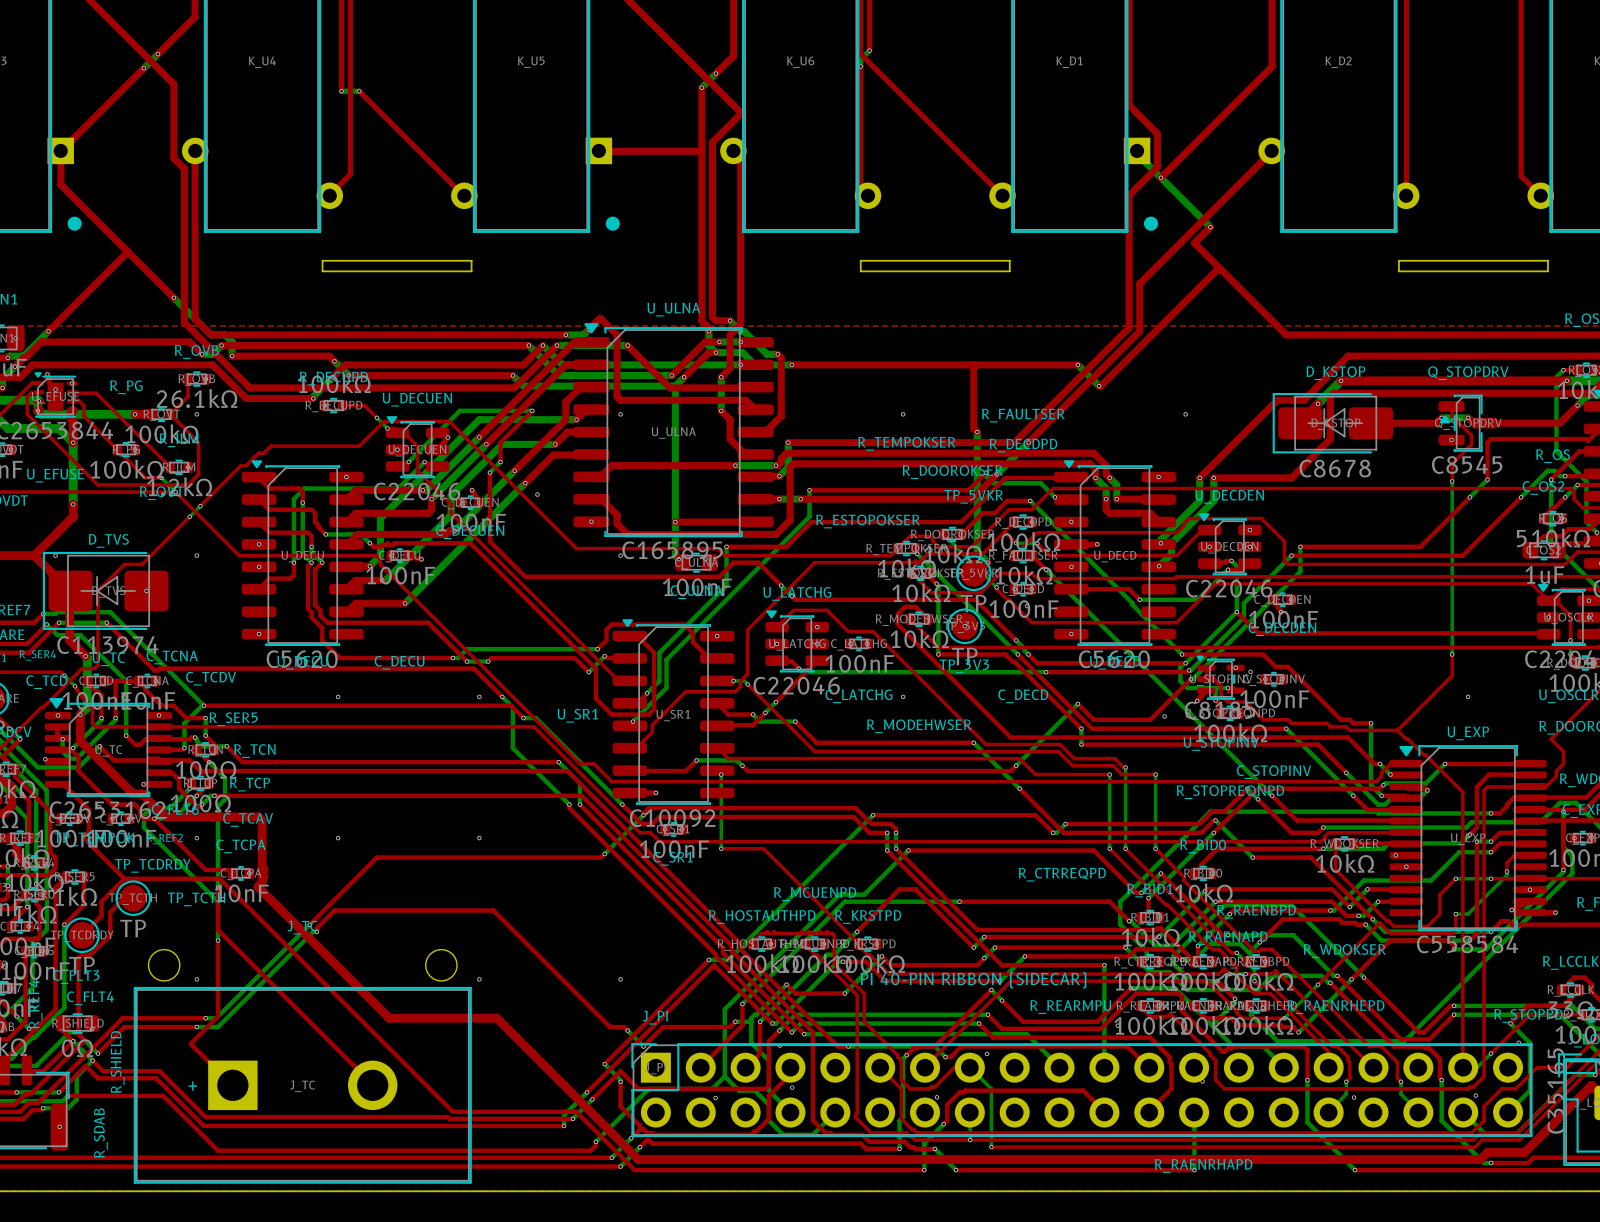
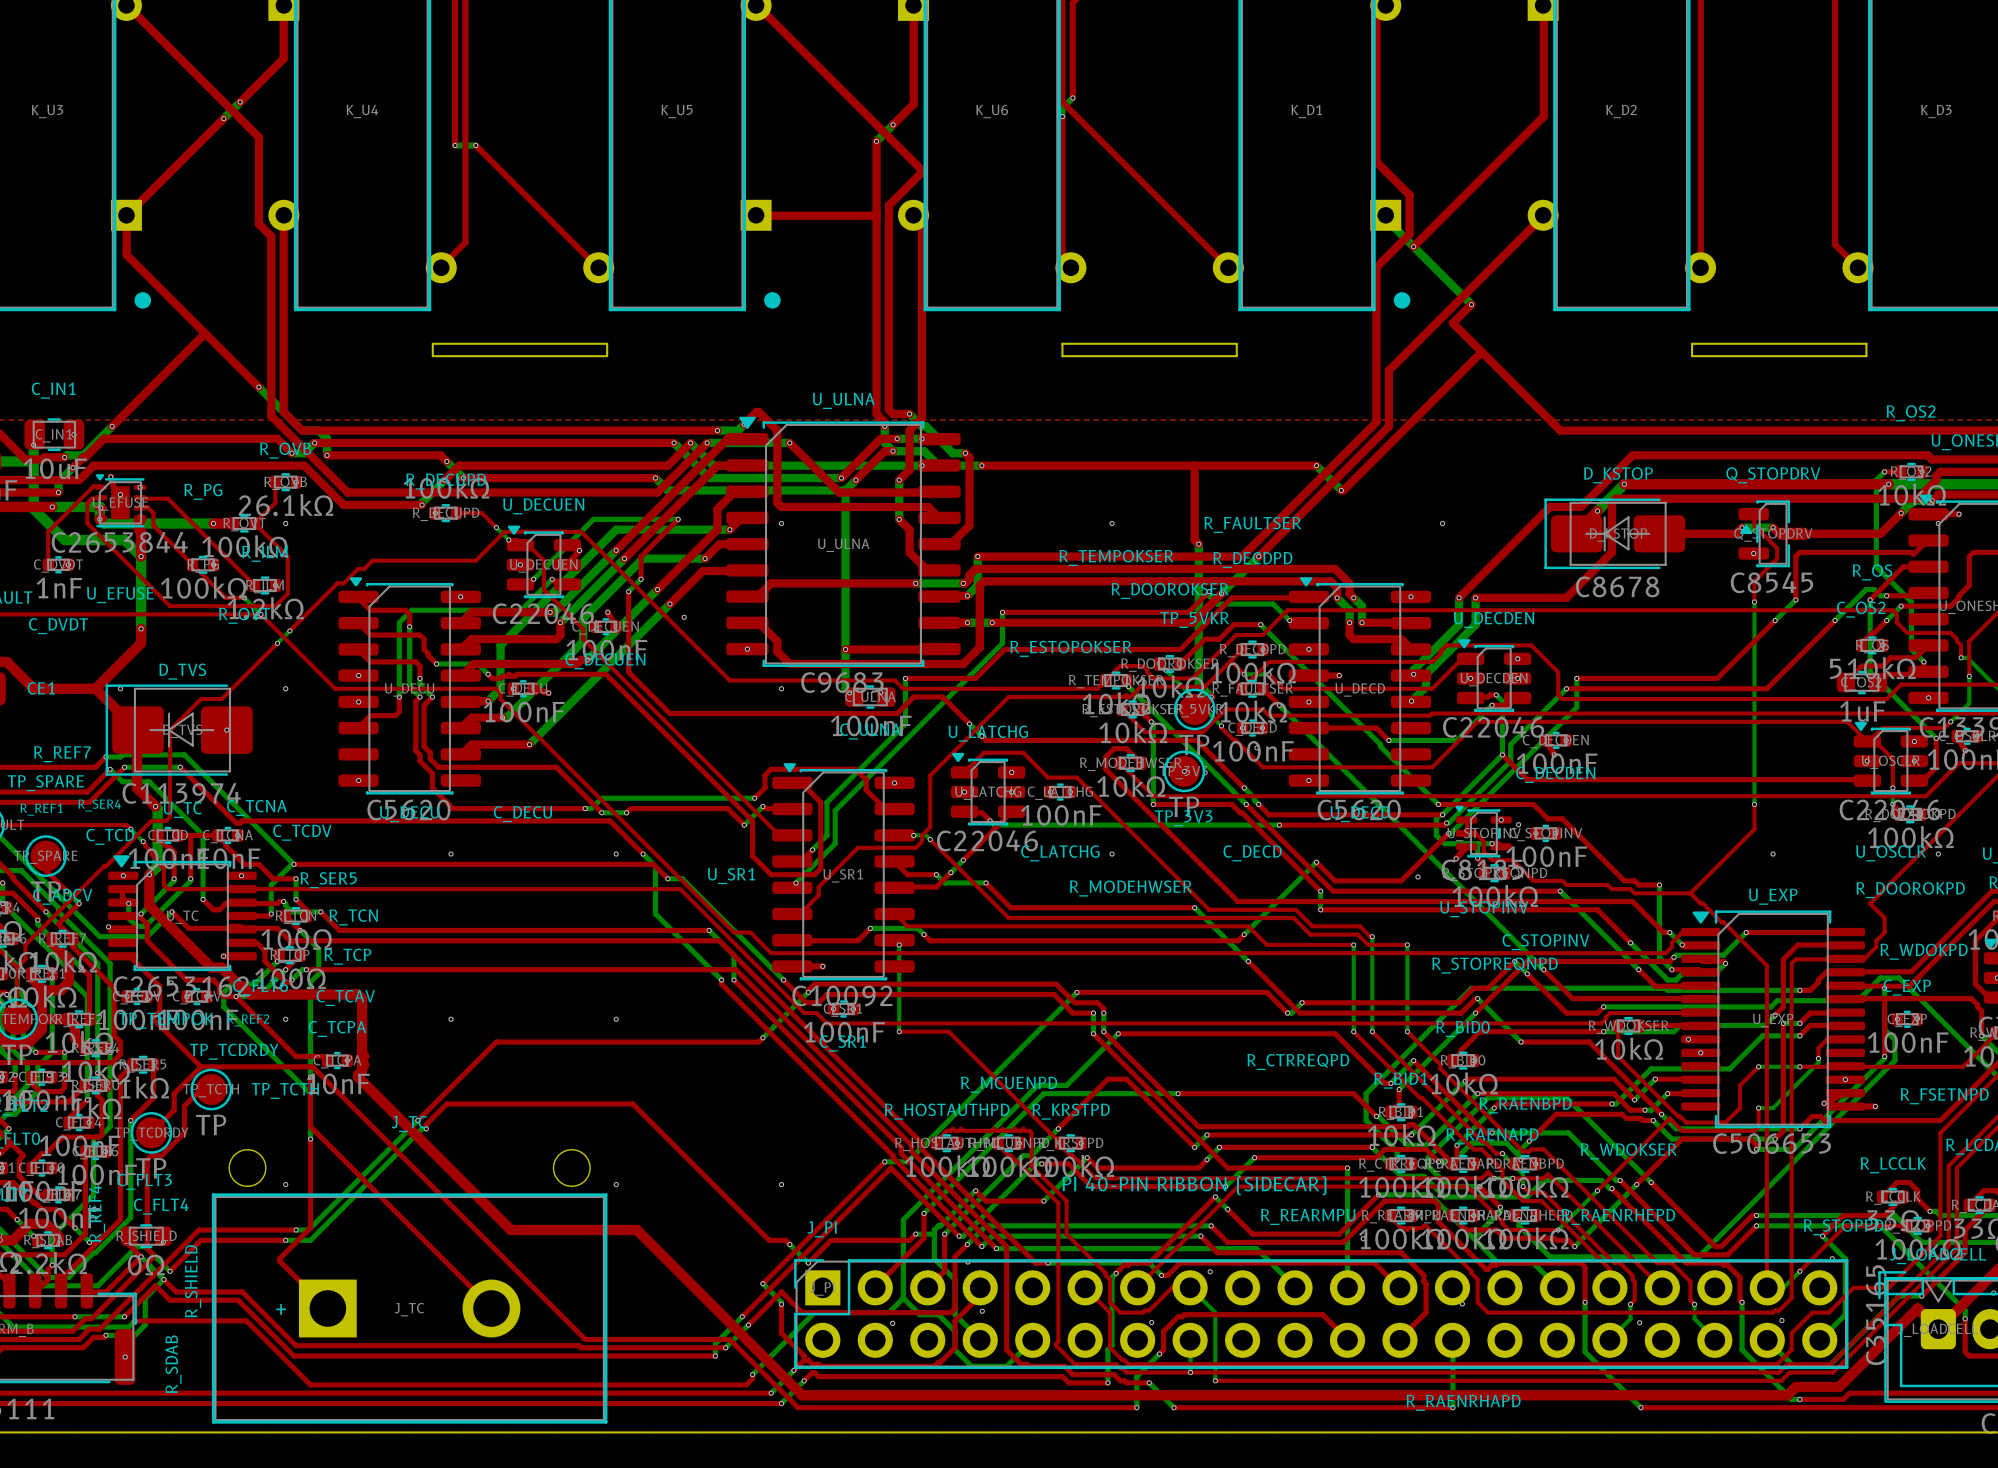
U_ULNA value: C165895 (672, 550) -> C9683 (842, 682)
U_EXP value: C558584 (1467, 944) -> C506653 (1772, 1143)

